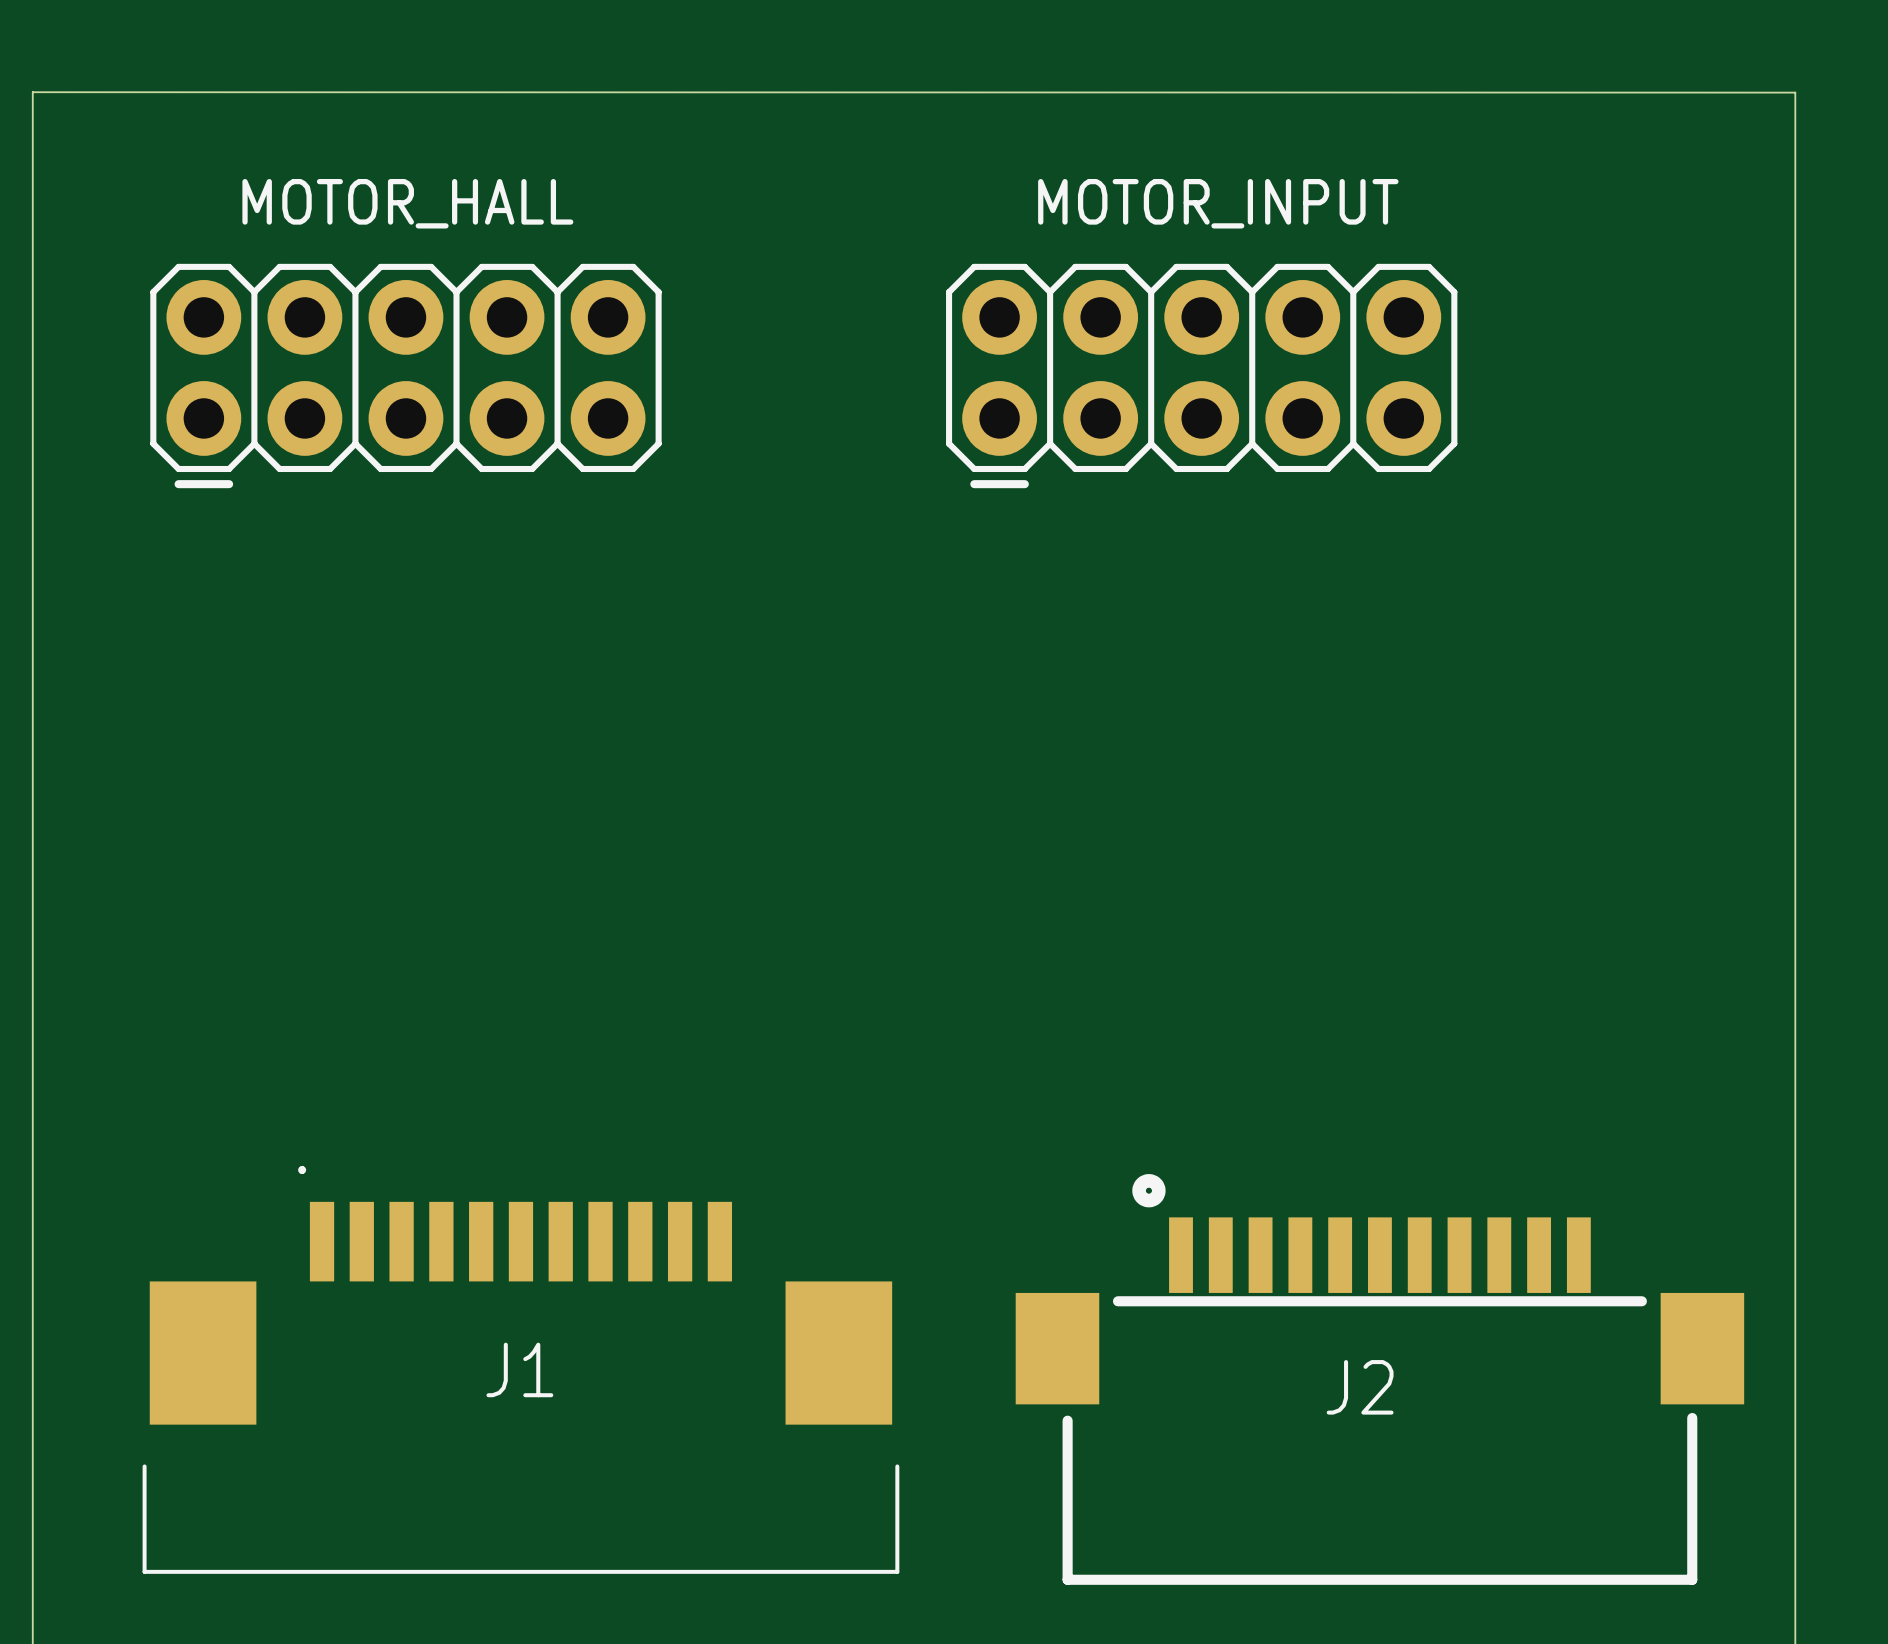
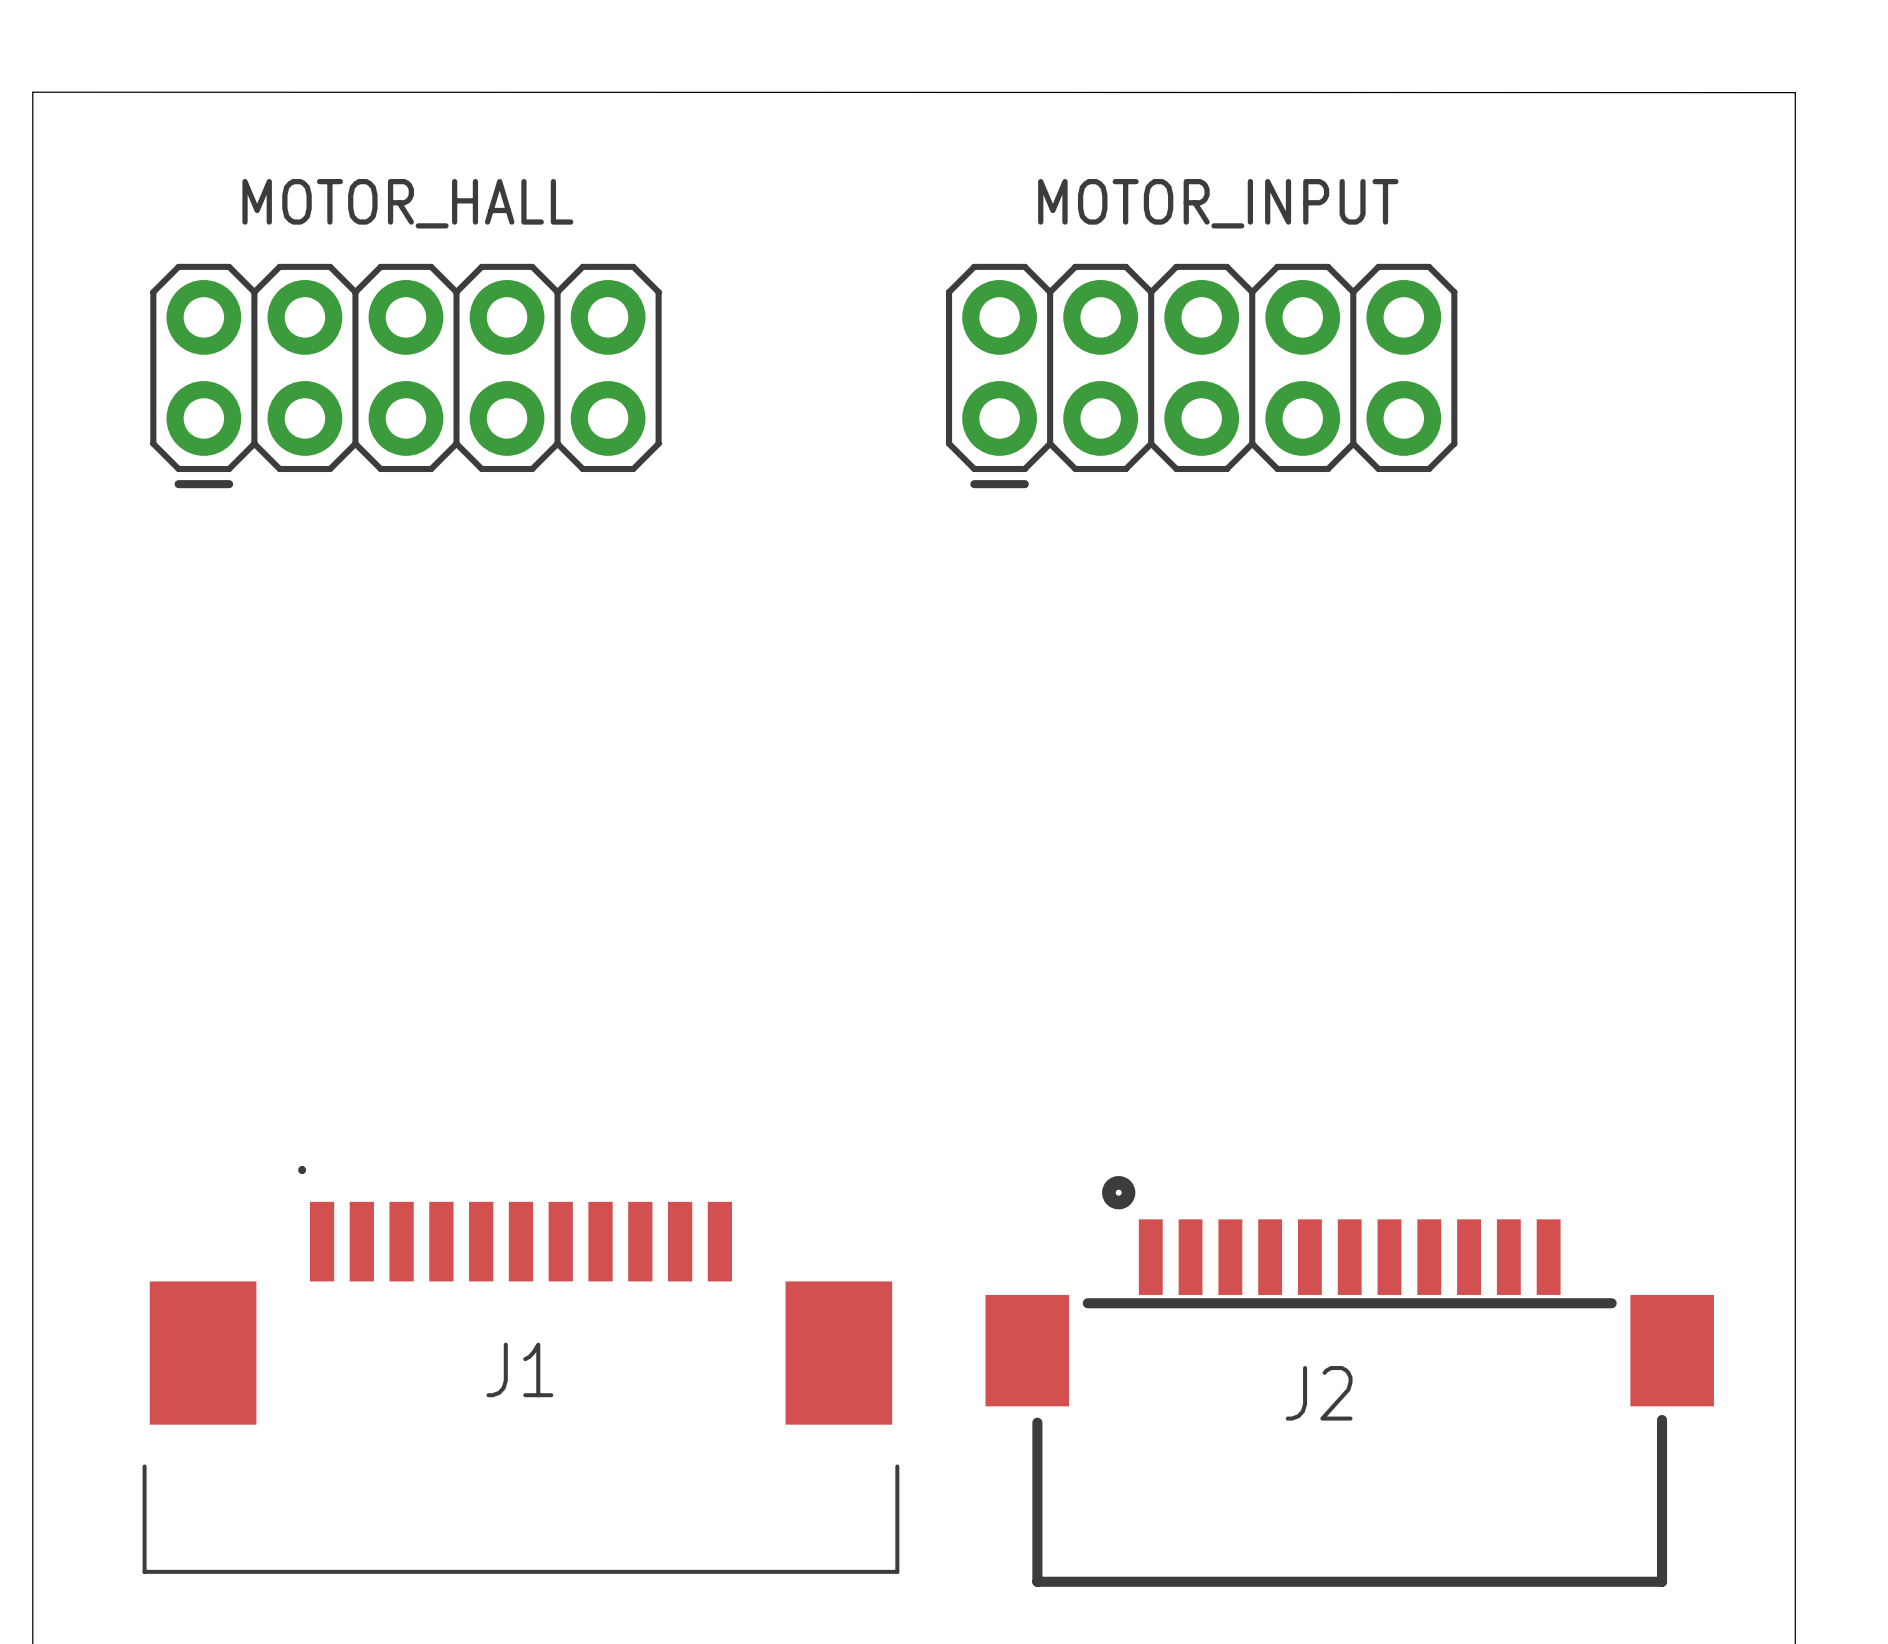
J2 position: (1379, 1379) -> (1349, 1381)
J2 name position: J2 (1360, 1387) -> J2 (1319, 1393)

